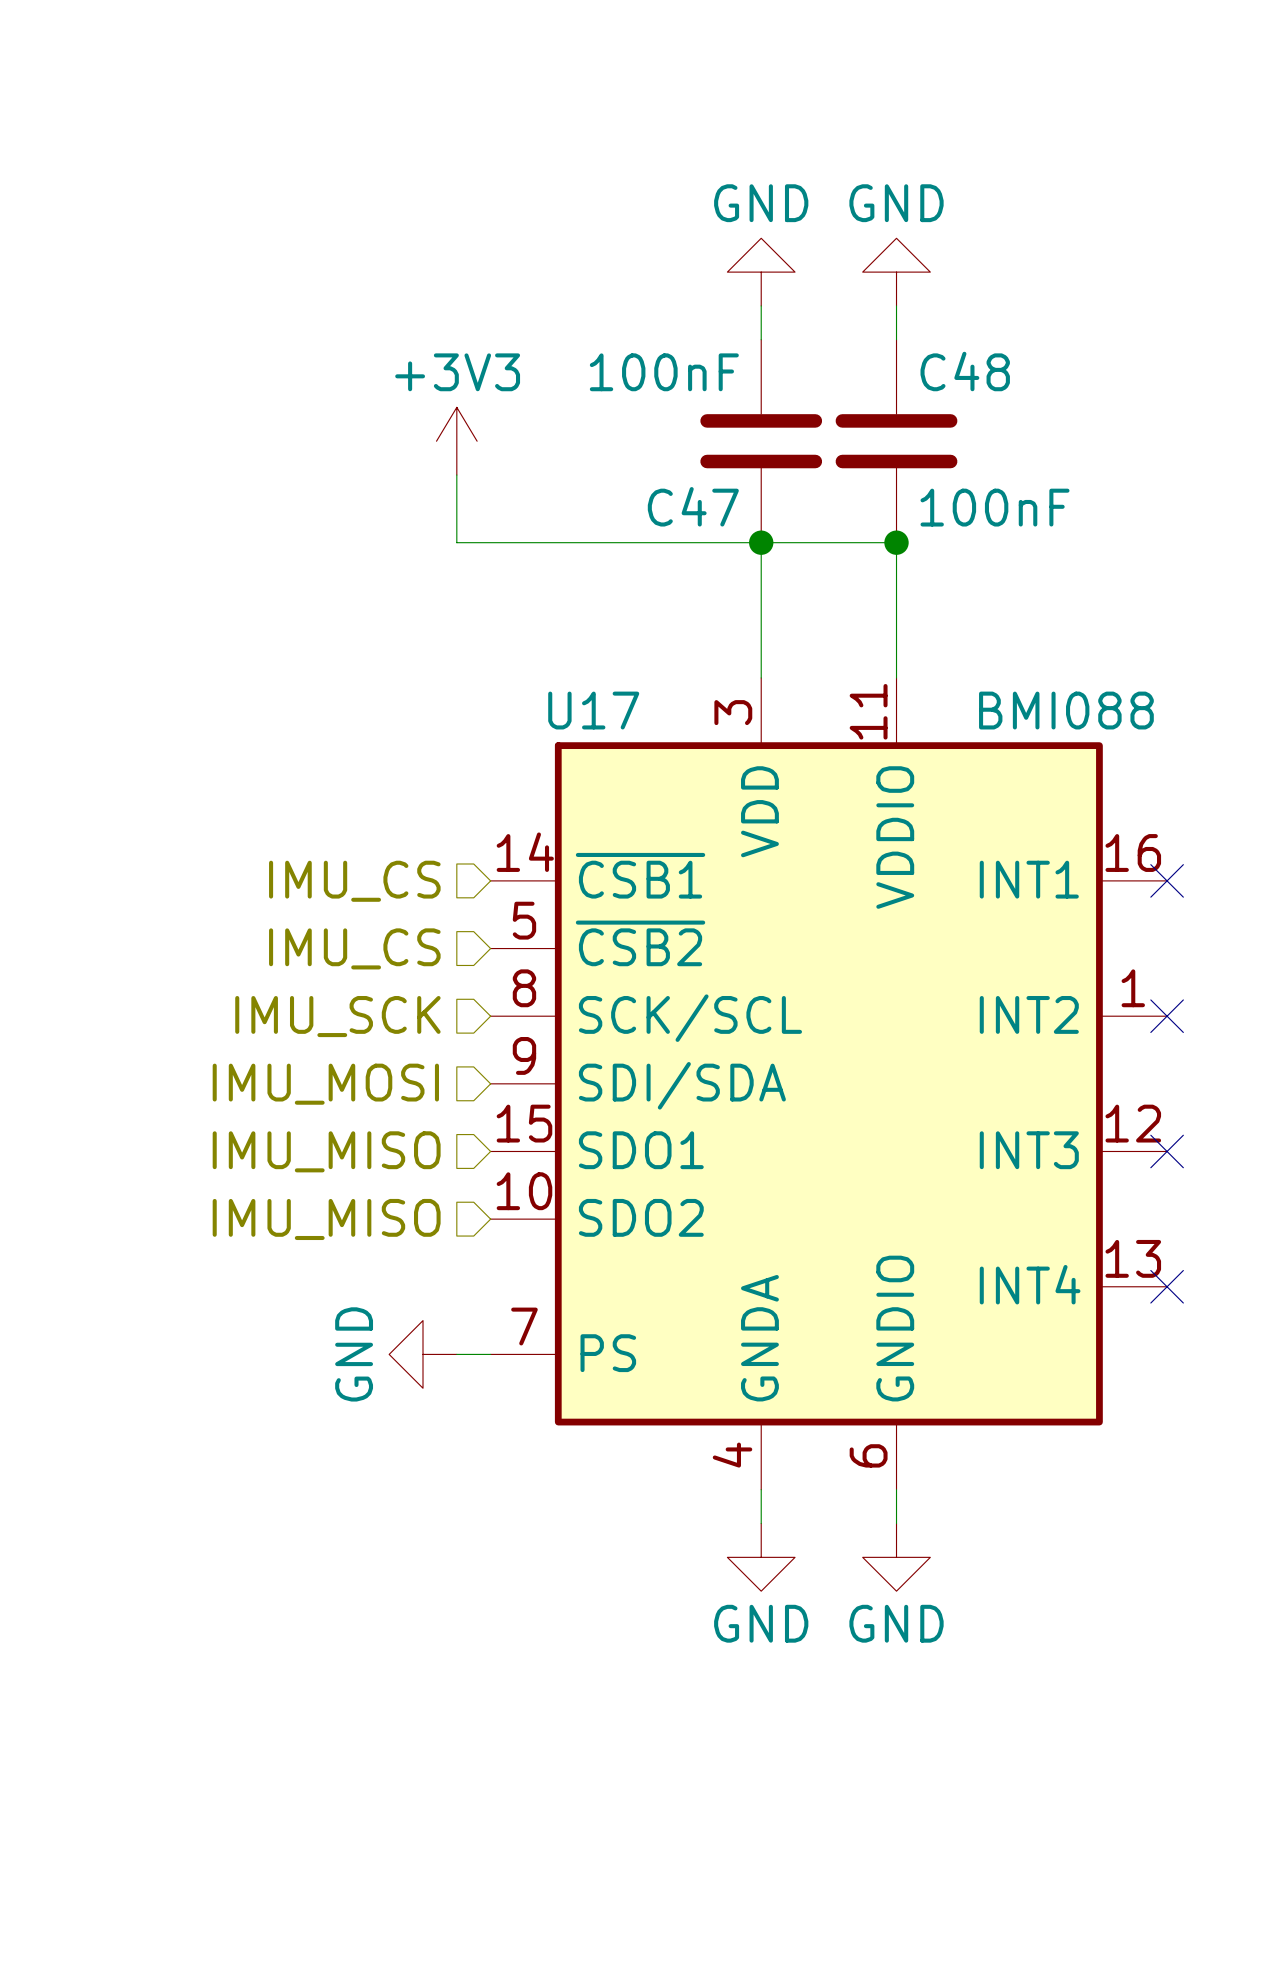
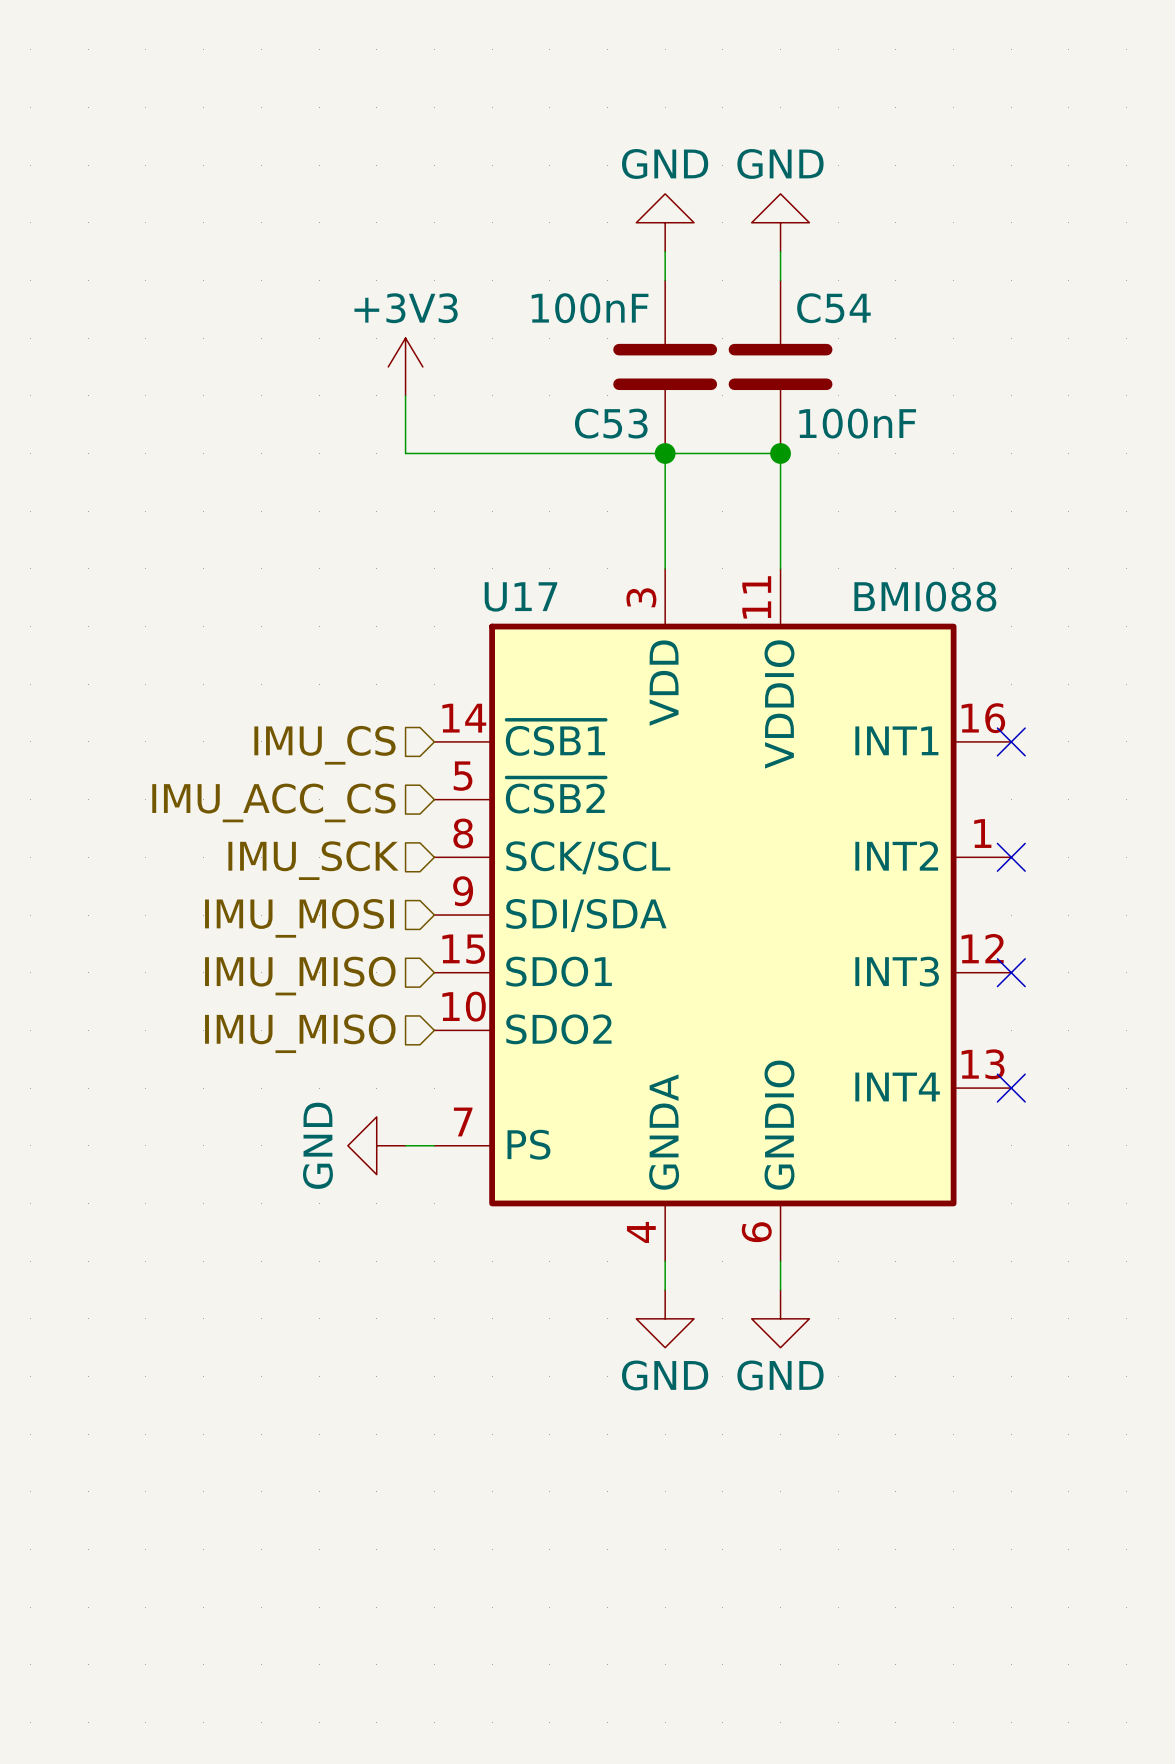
C48 name: C48 (965, 371) -> C54 (833, 308)
C47 name: C47 (693, 506) -> C53 (611, 423)
hierarchical label: IMU_CS (354, 948) -> IMU_ACC_CS (273, 802)

